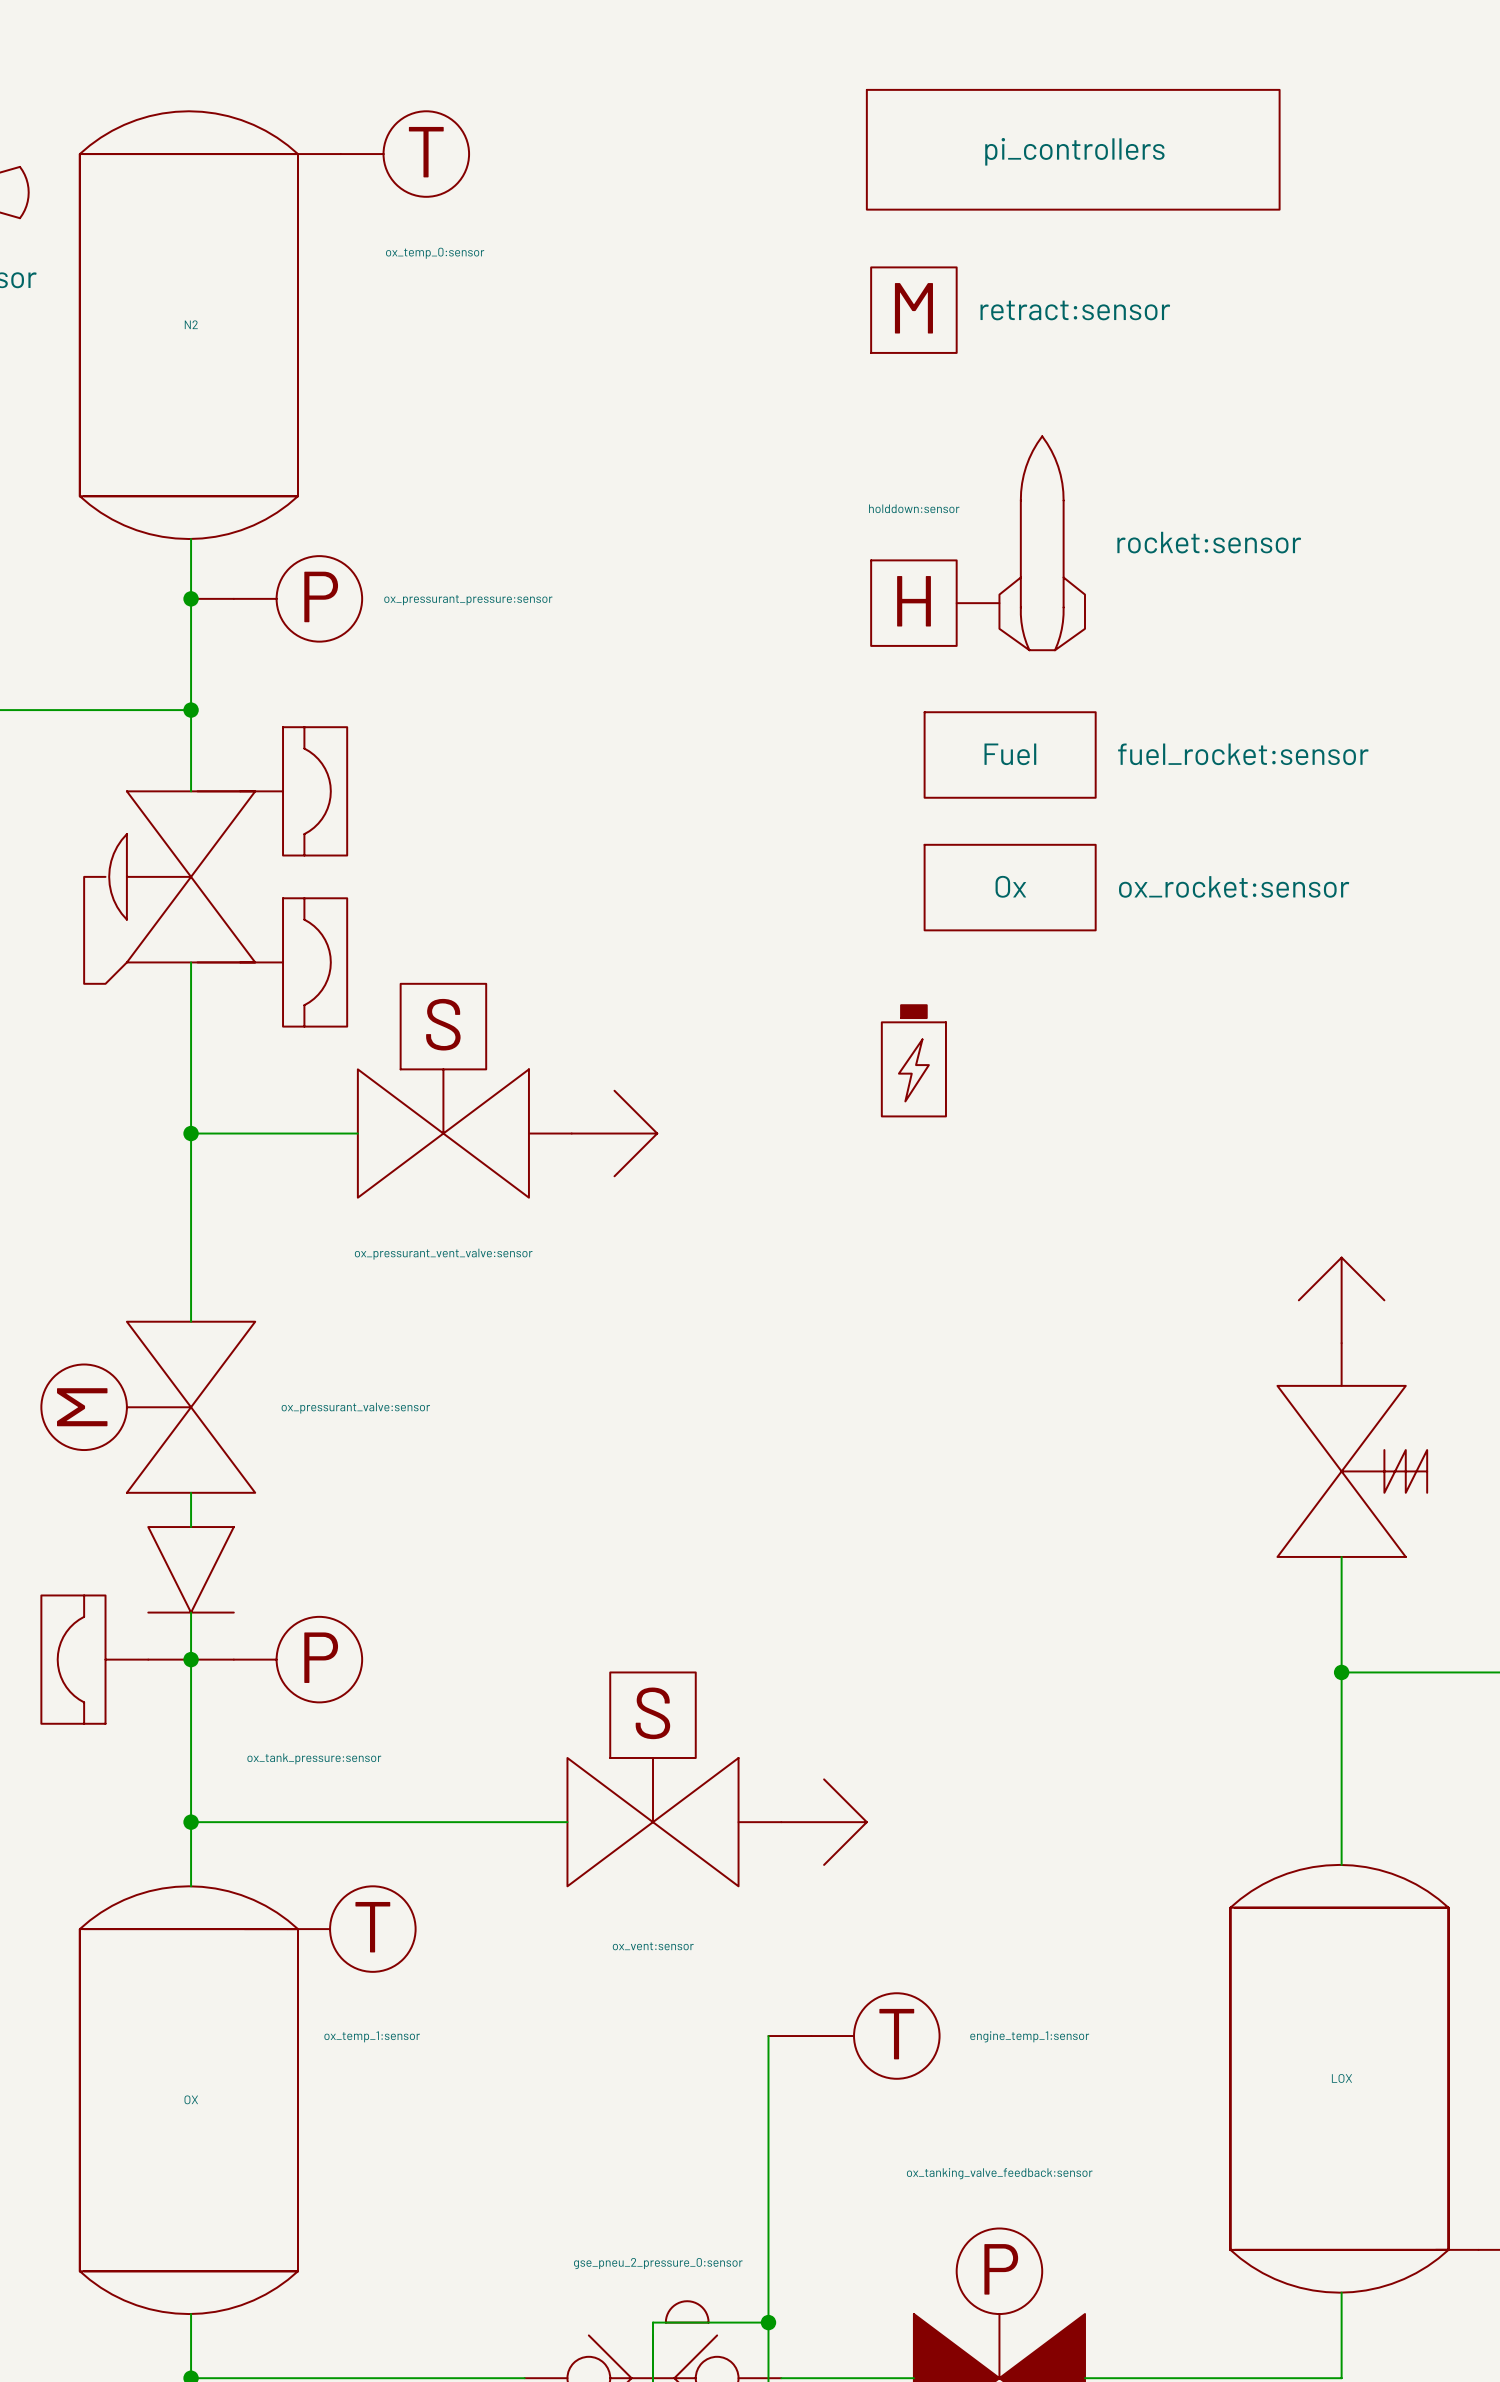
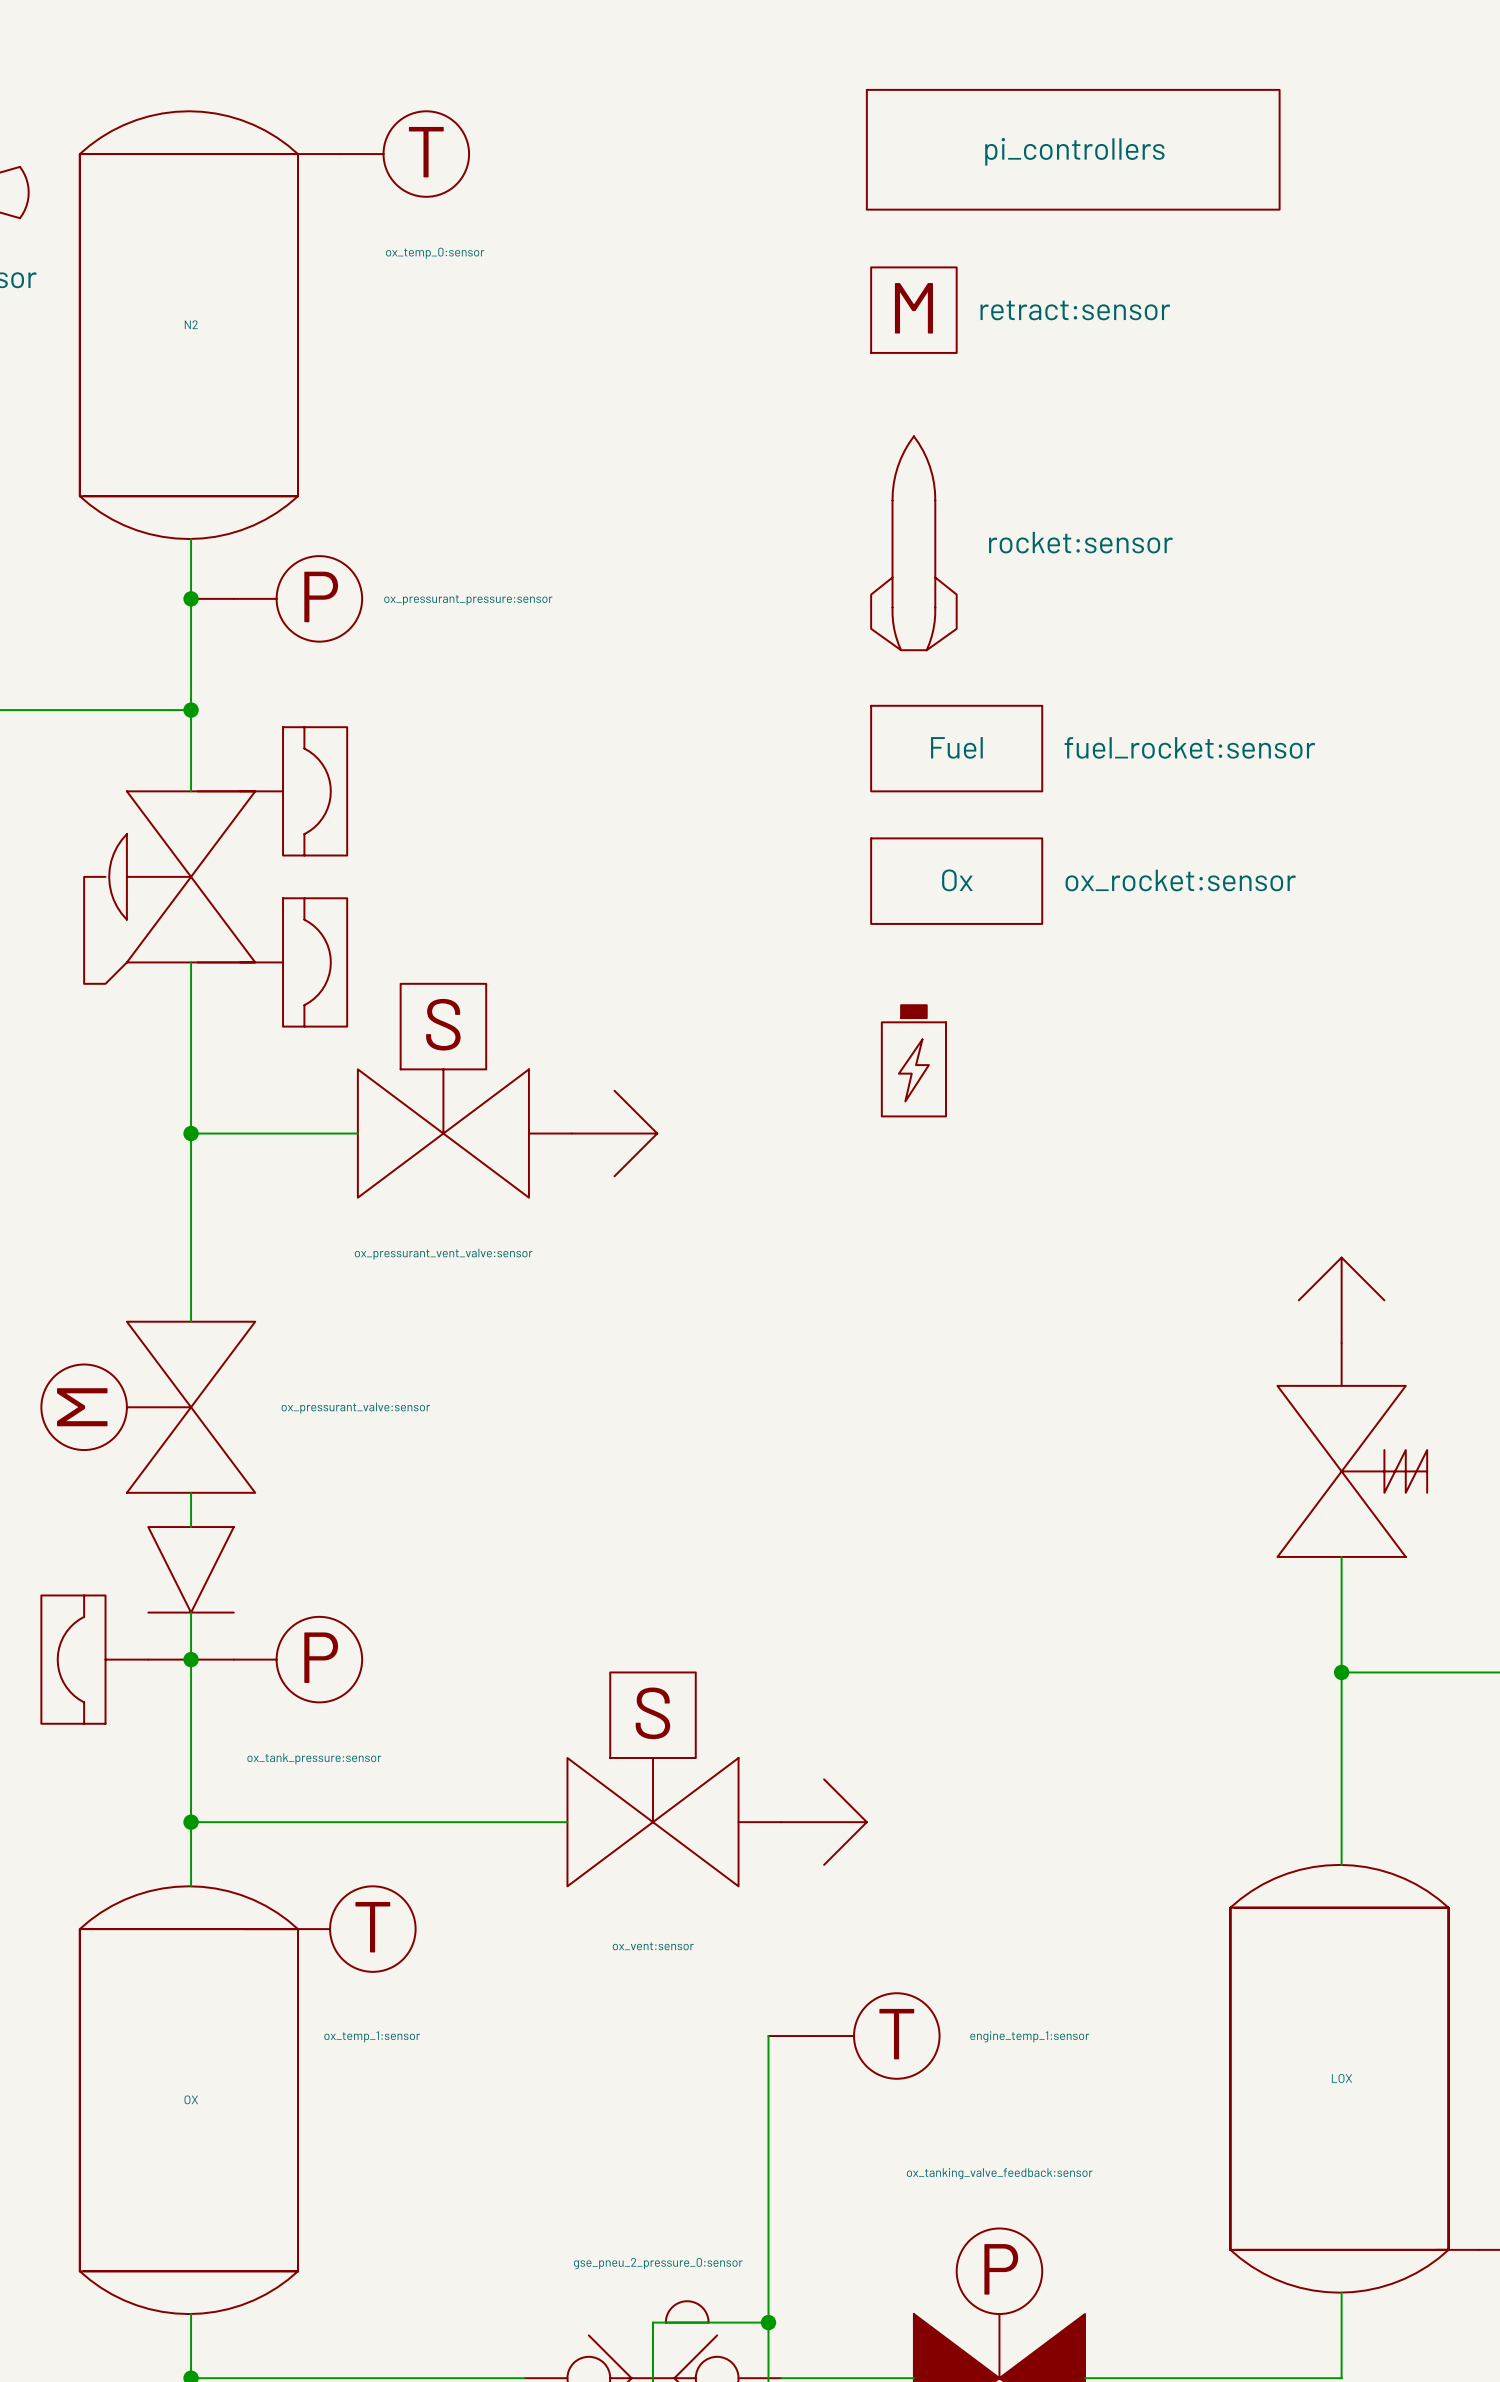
part position: (1042, 543) -> (913, 543)
part: holddown:sensor (935, 603) -> none
Fuel position: (1010, 754) -> (956, 748)
Ox position: (1010, 887) -> (956, 881)

